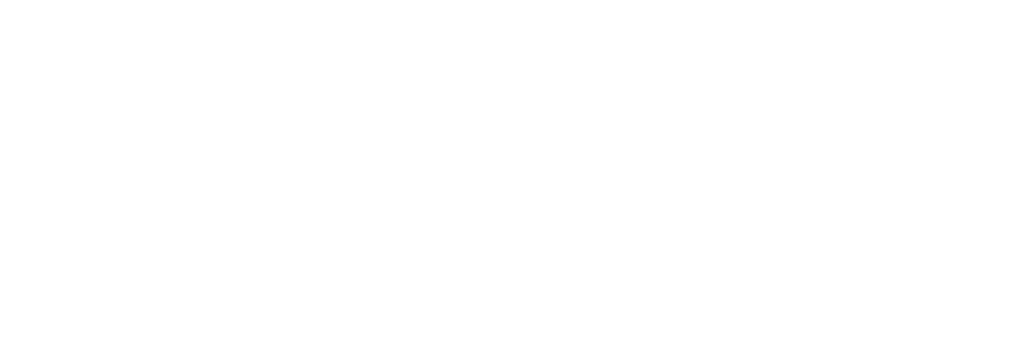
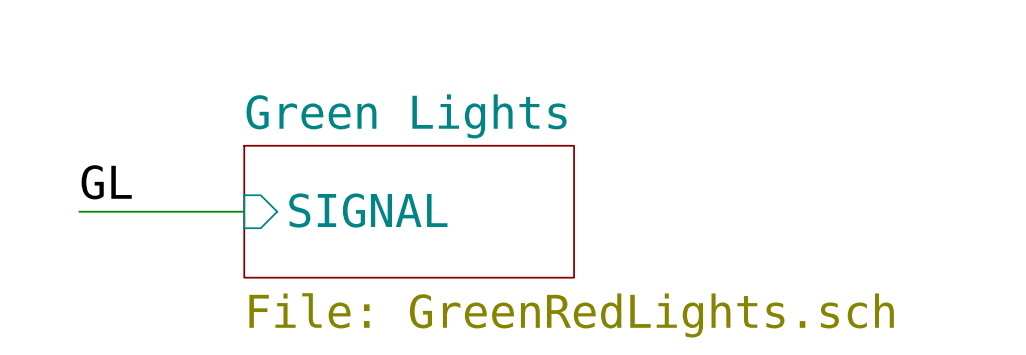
label: none -> GL (106, 182)
sheet pin: none -> SIGNAL (368, 210)
wire: none -> (79, 211) (244, 211)
sheet Green Lights: none -> File: GreenRedLights.sch (409, 211)

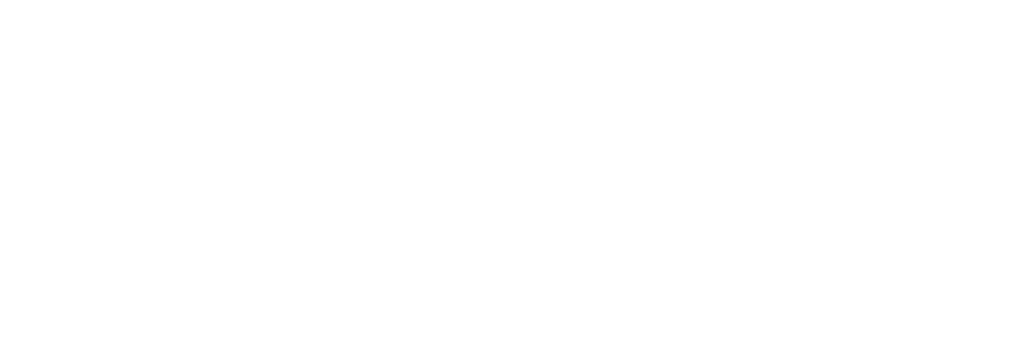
label: GL (106, 182) -> none
sheet pin: SIGNAL (368, 210) -> none
wire: (79, 211) (244, 211) -> none
sheet Green Lights: File: GreenRedLights.sch (409, 211) -> none

